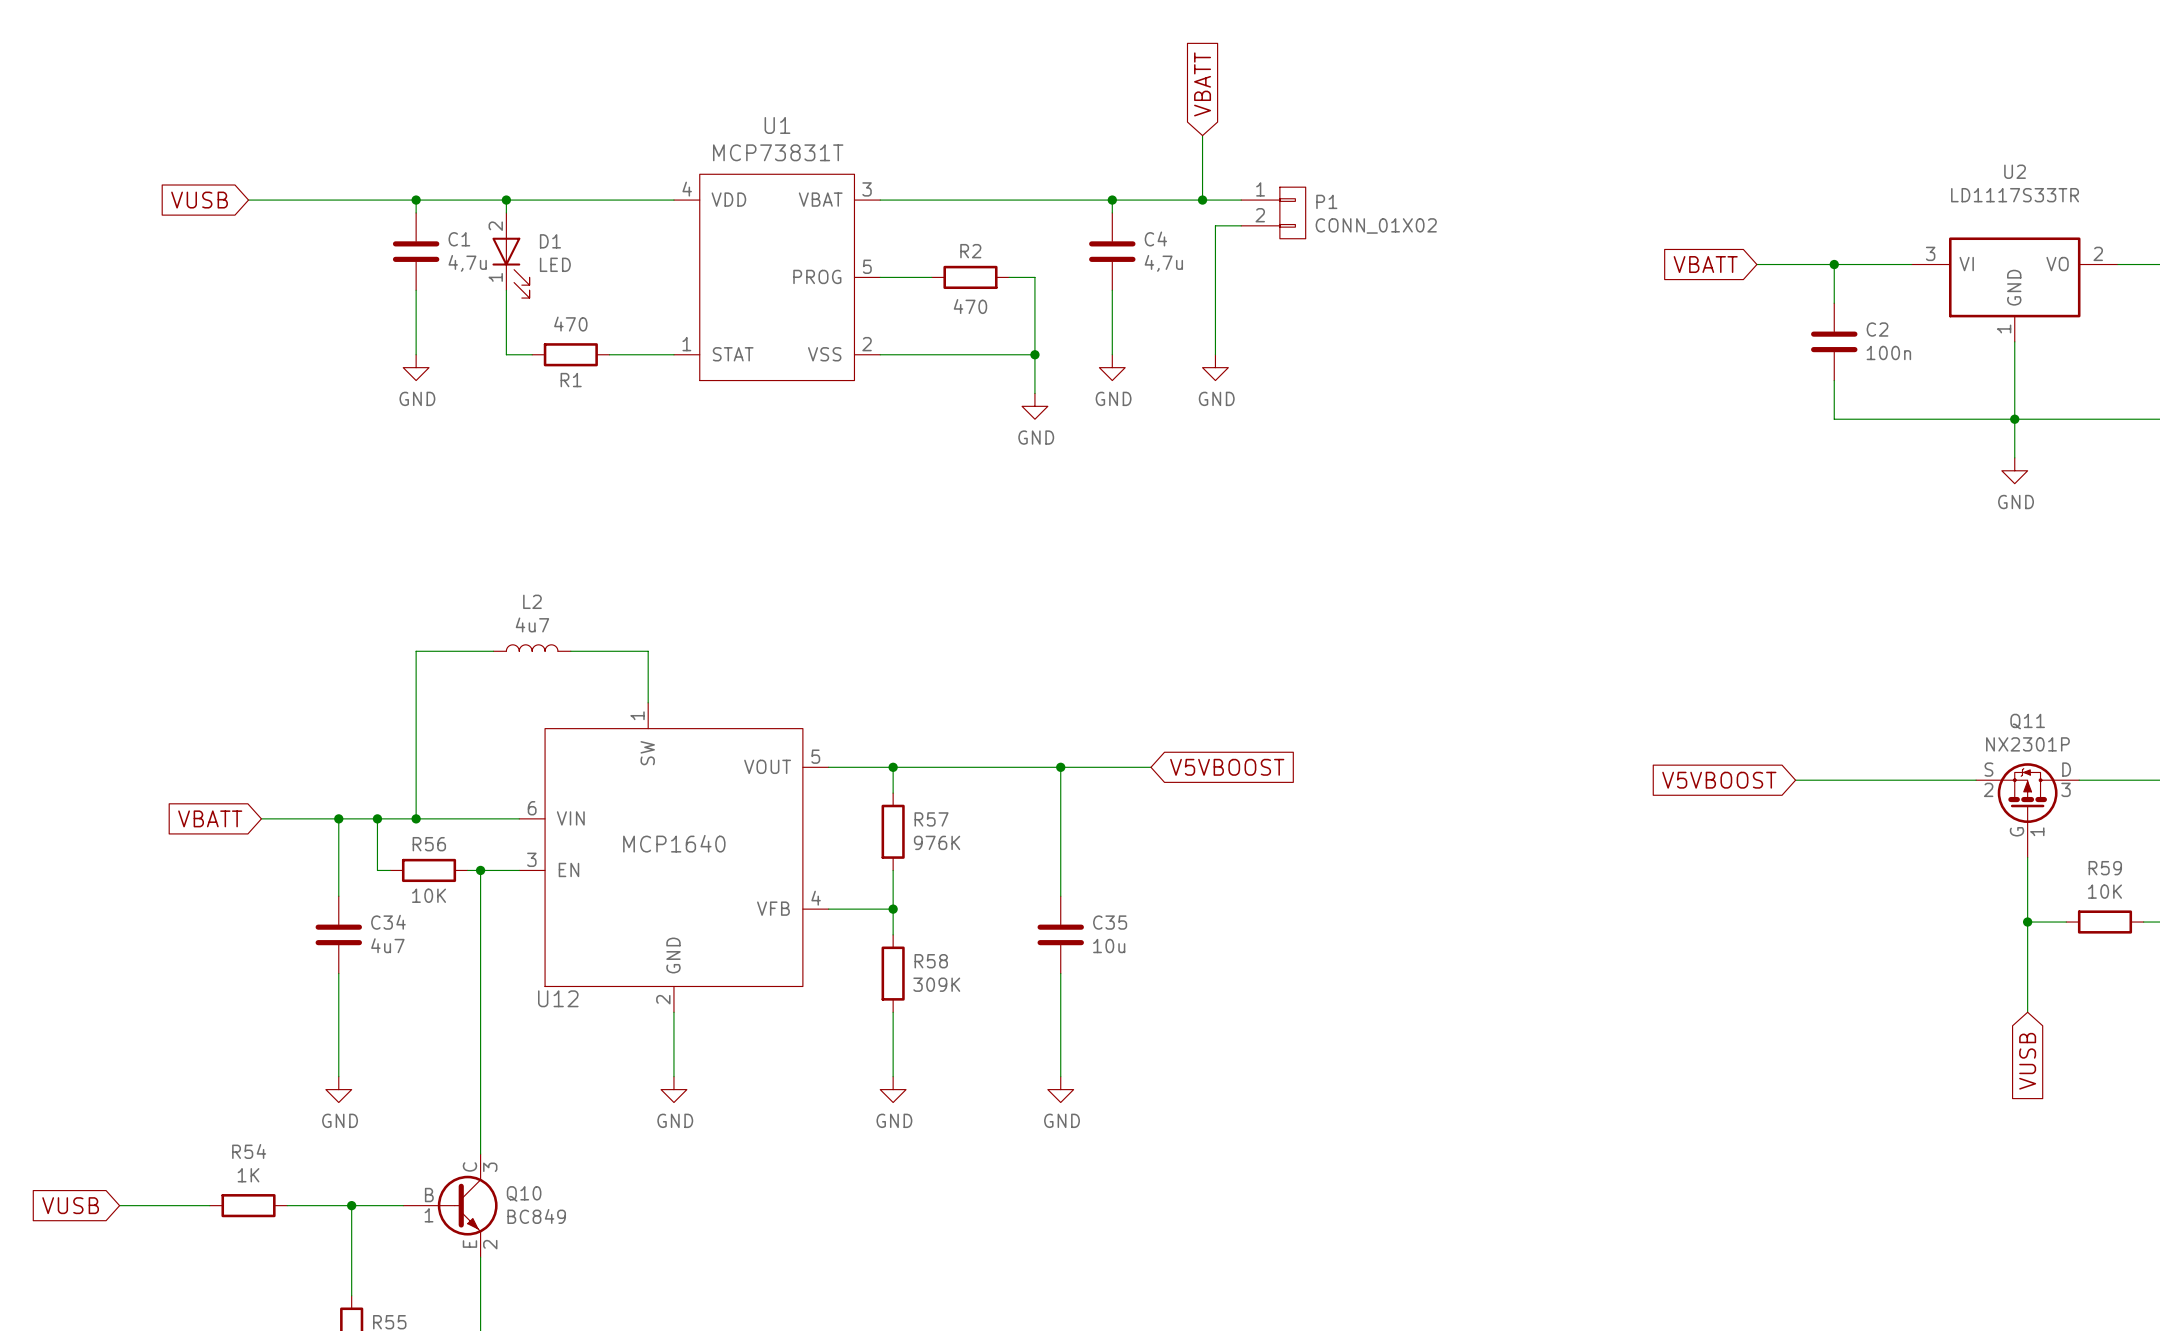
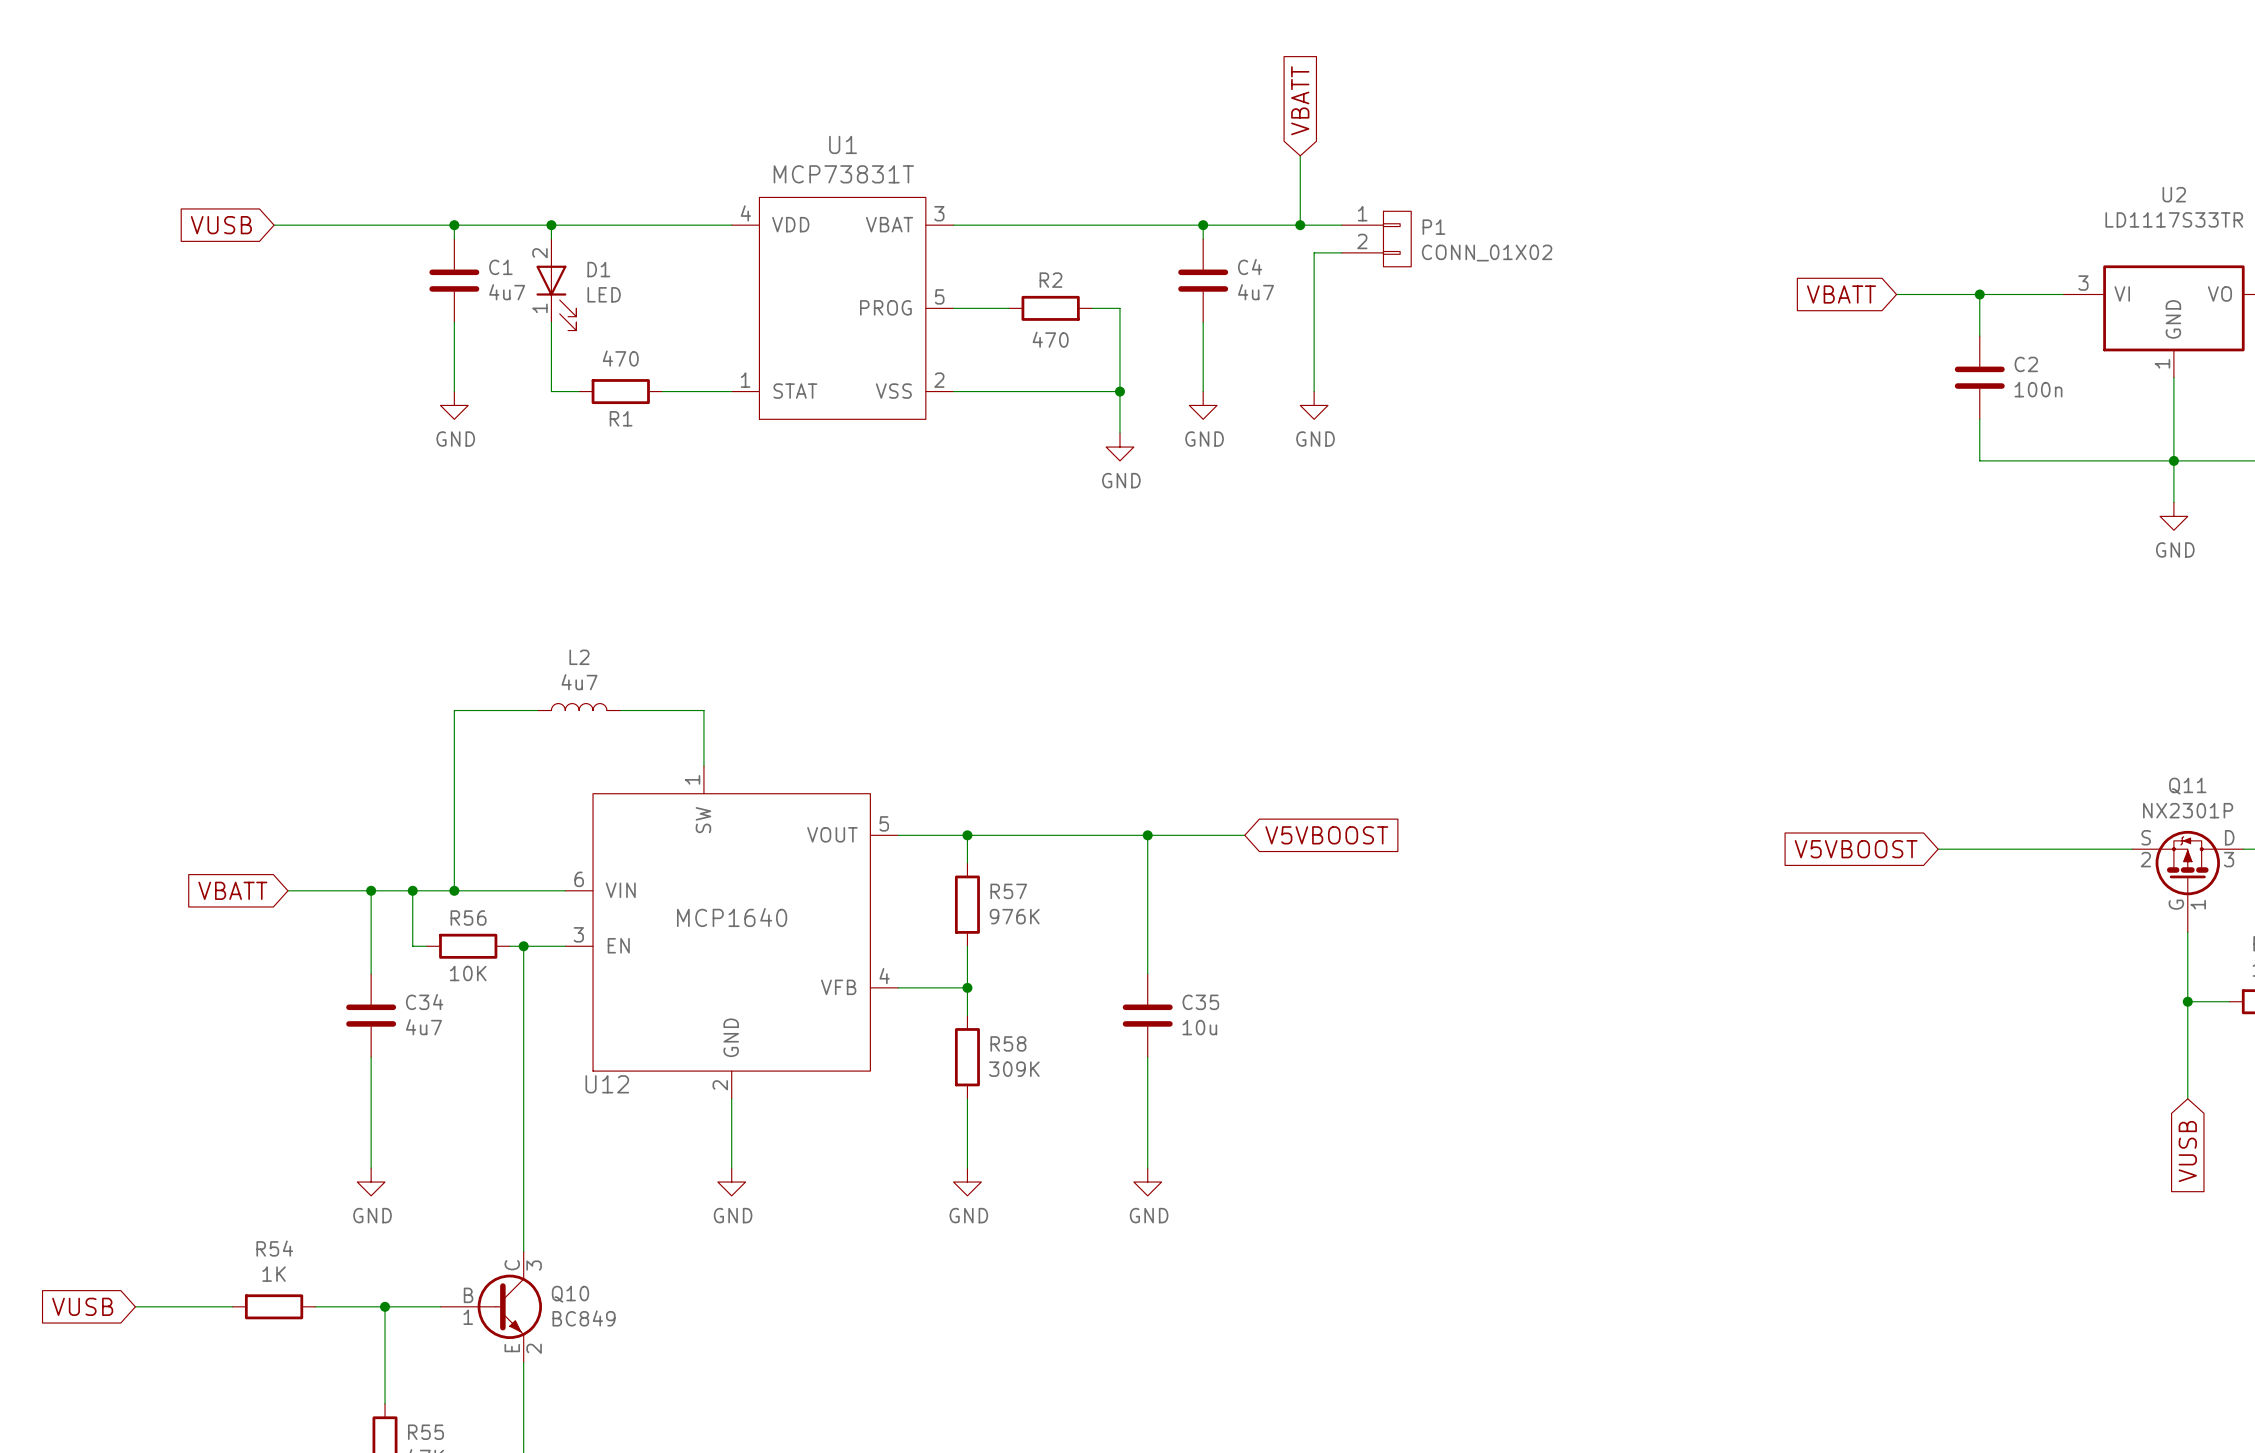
C1 value: 4,7u (467, 263) -> 4u7 (507, 292)
C4 value: 4,7u (1163, 263) -> 4u7 (1255, 292)

